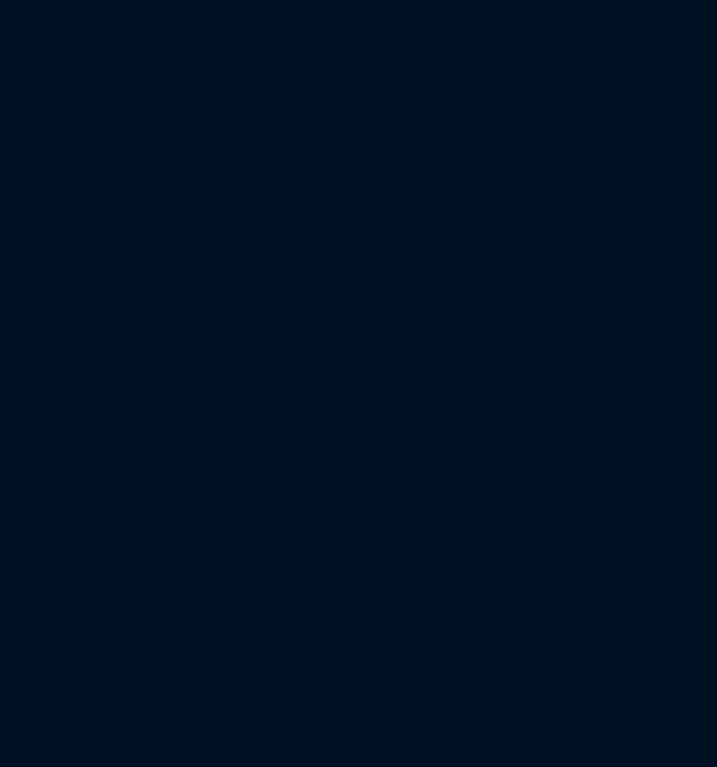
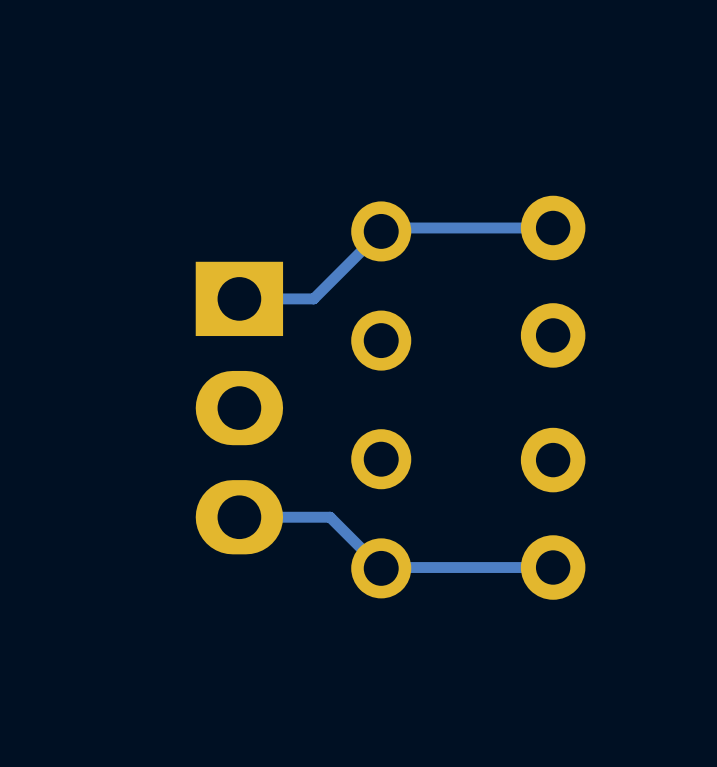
track: none -> (553, 227) (384, 227) (313, 298) (239, 298)
part: none -> (553, 281)
part: none -> (381, 286)
part: none -> (239, 408)
part: none -> (381, 513)
part: none -> (553, 513)
track: none -> (239, 517) (330, 517) (380, 567) (553, 567)

